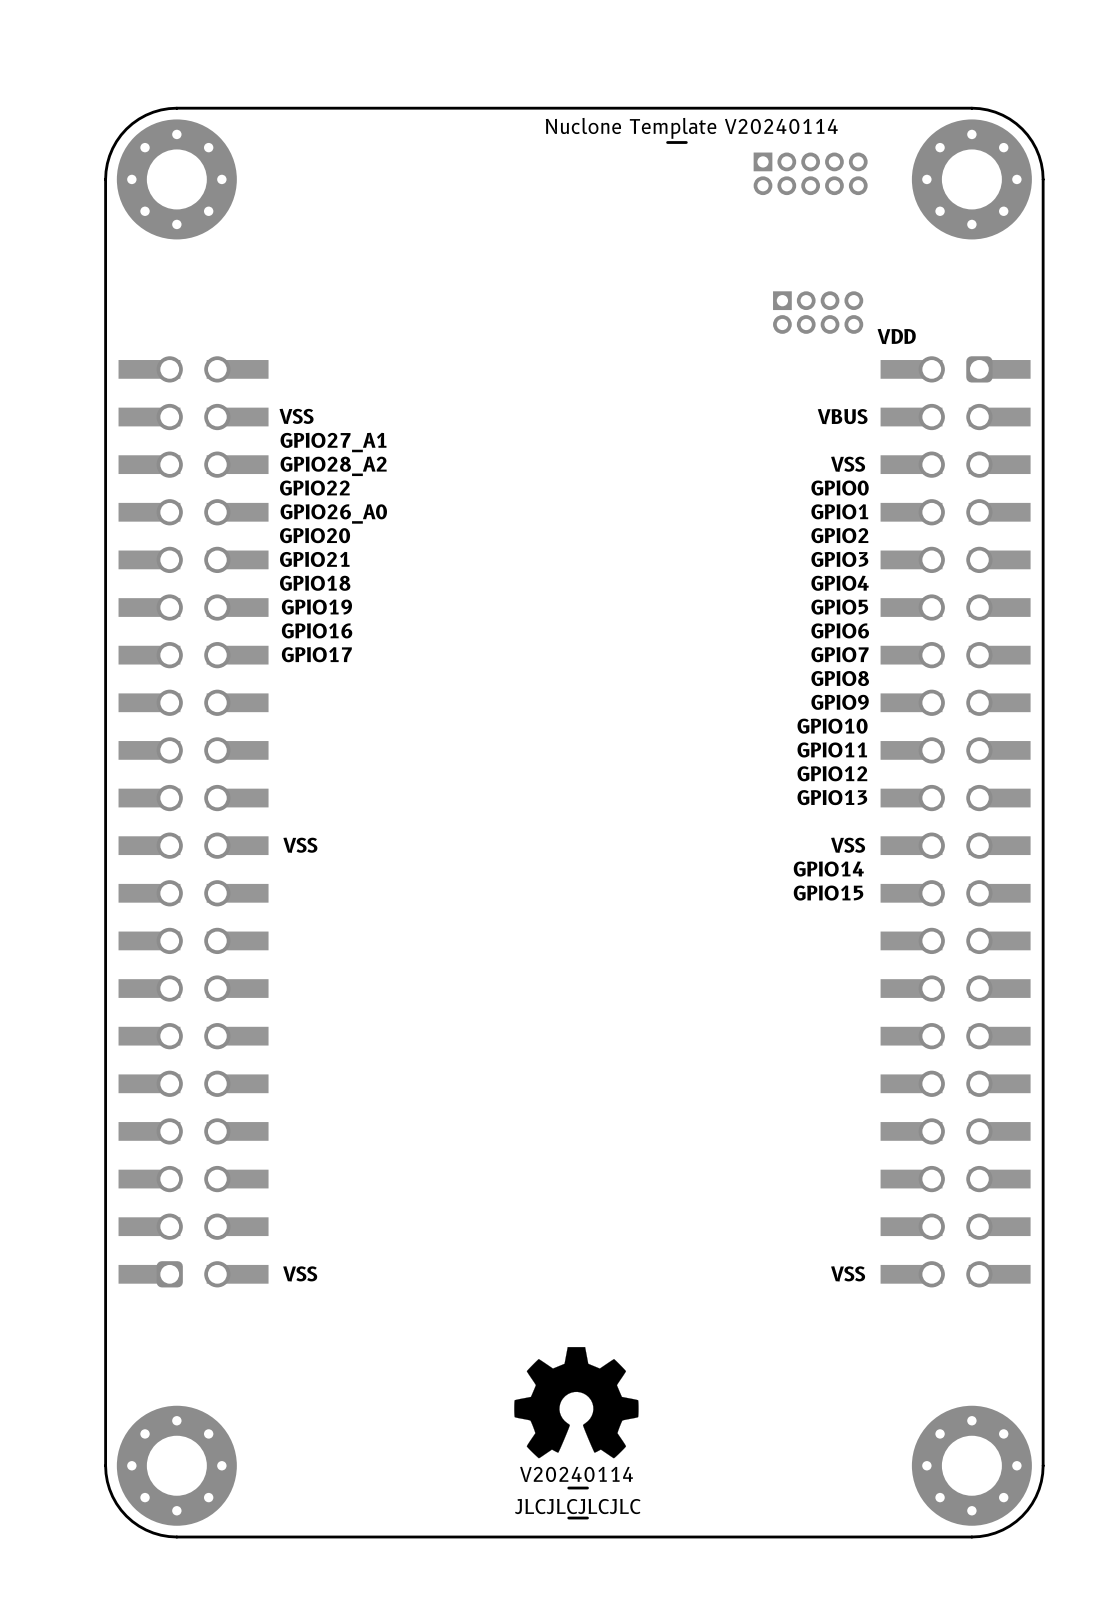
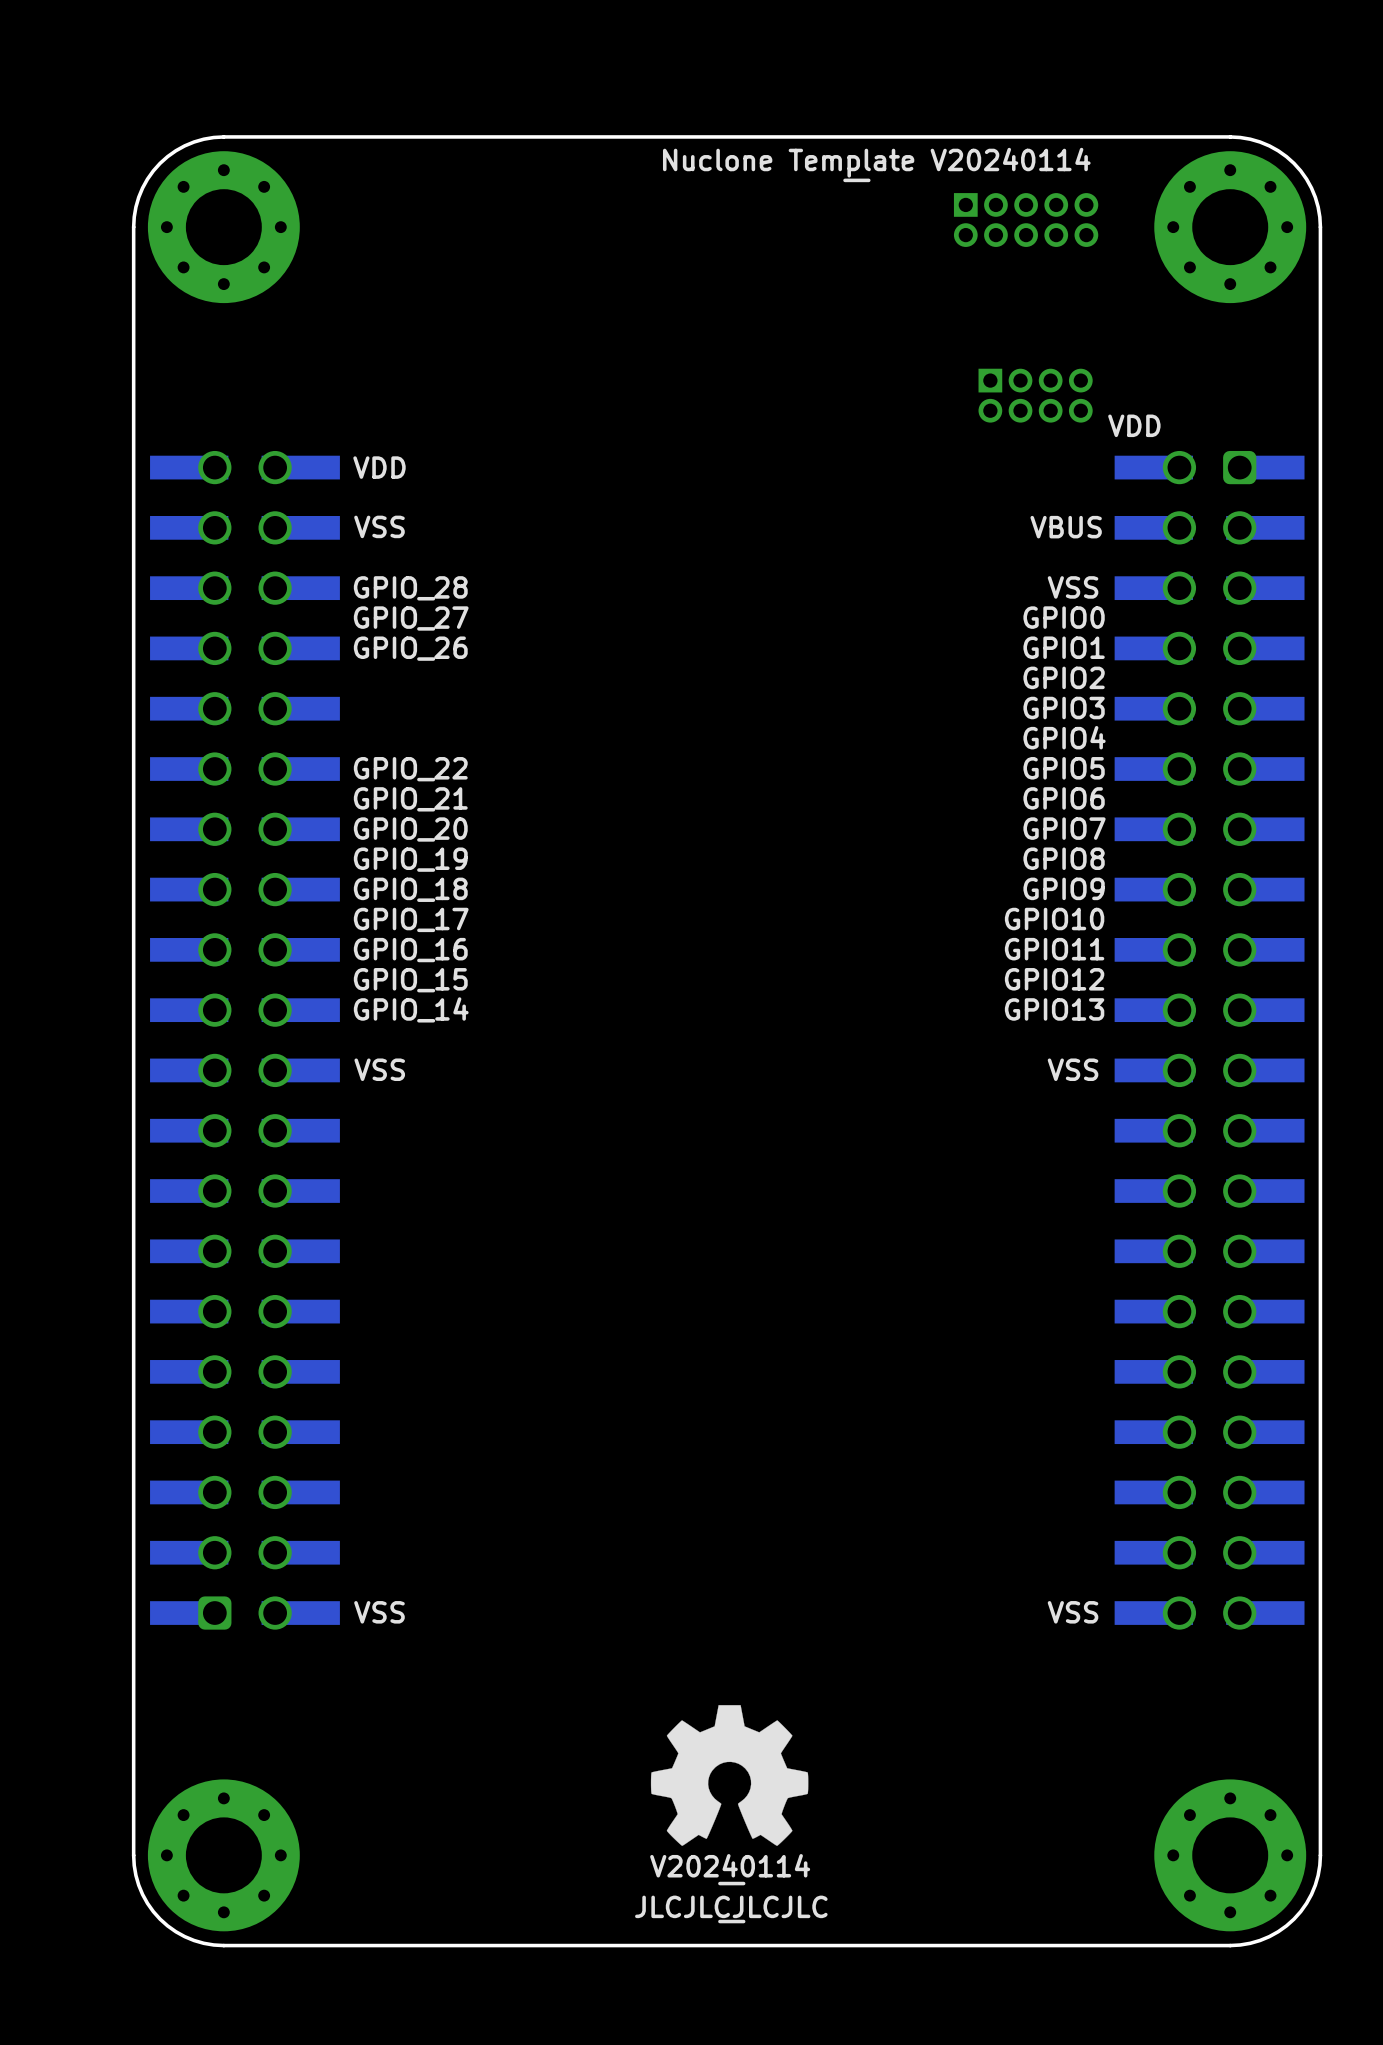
part footprint: [118, 356, 269, 1288] -> [150, 450, 340, 1630]
part text: GPIO14 (828, 869) -> none
part text: GPIO15 (828, 893) -> none

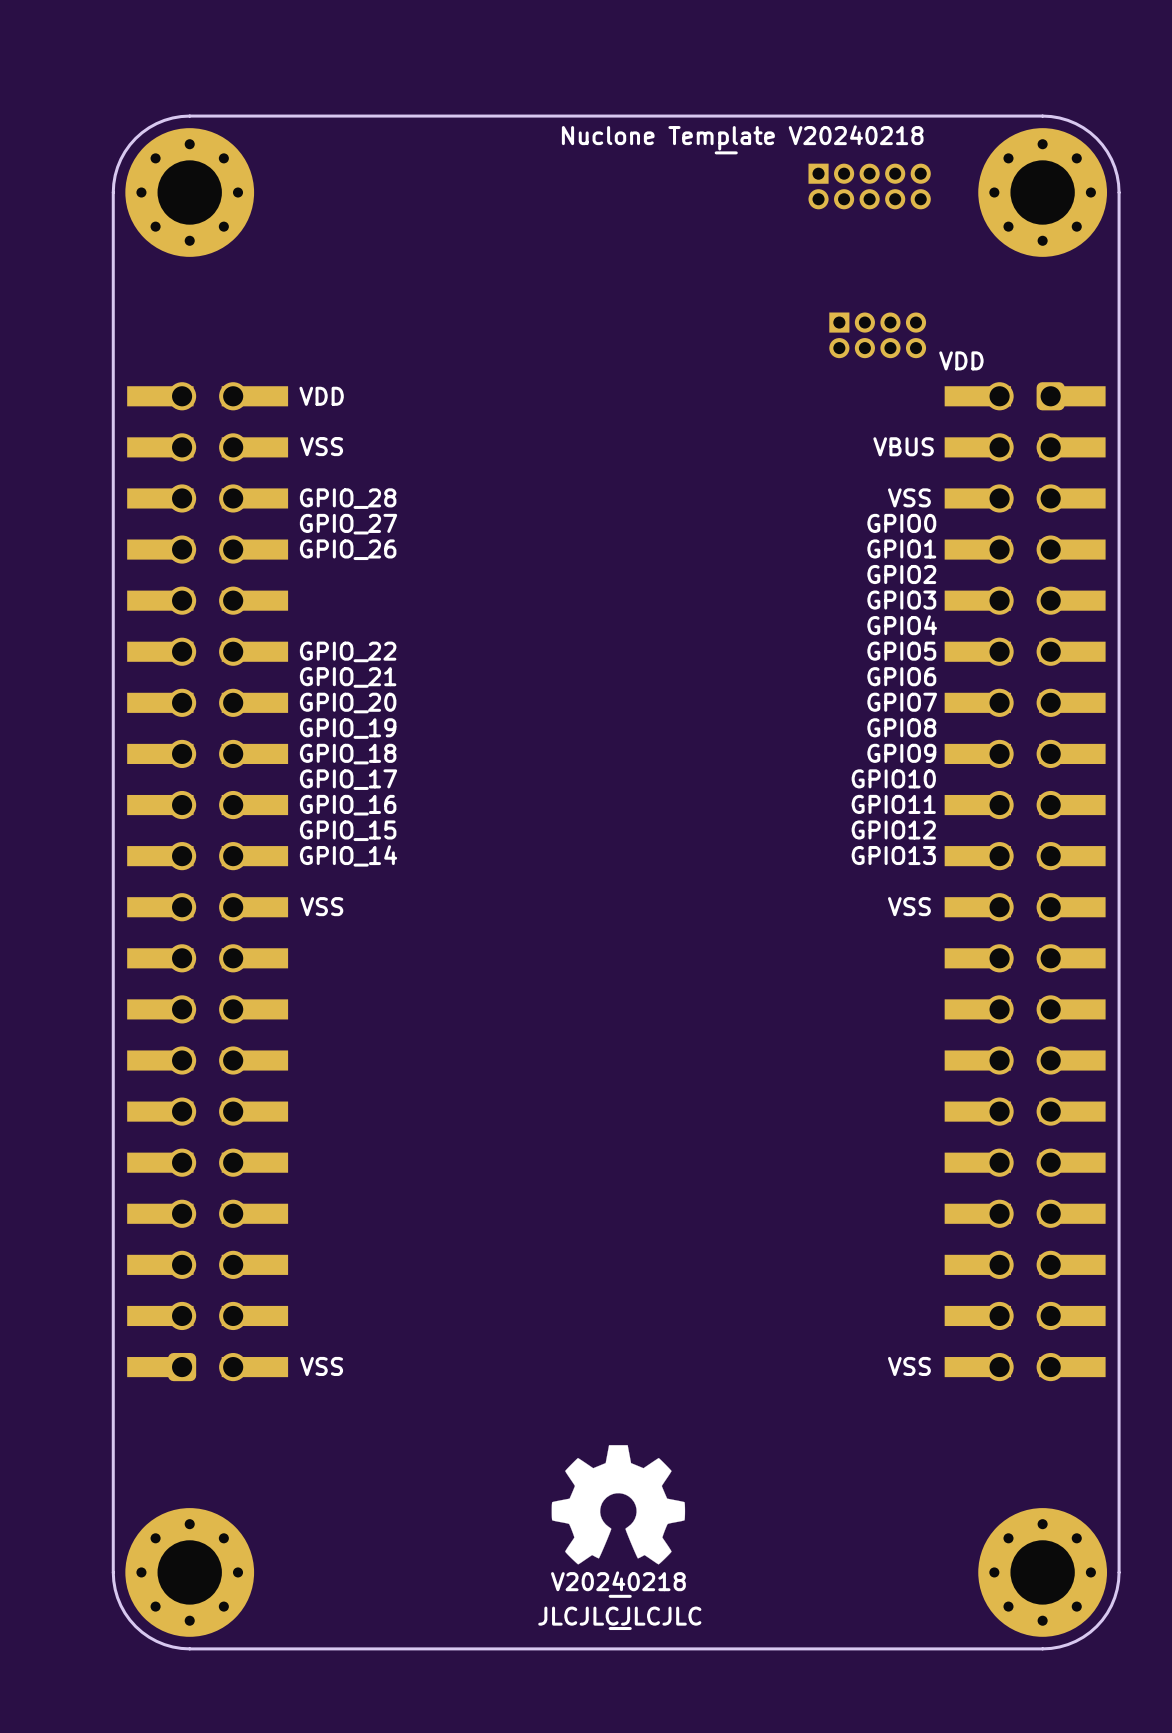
drawing shape: [662, 147, 1091, 183] -> [561, 125, 924, 155]
drawing shape: [650, 1854, 811, 1886] -> [551, 1571, 686, 1598]

